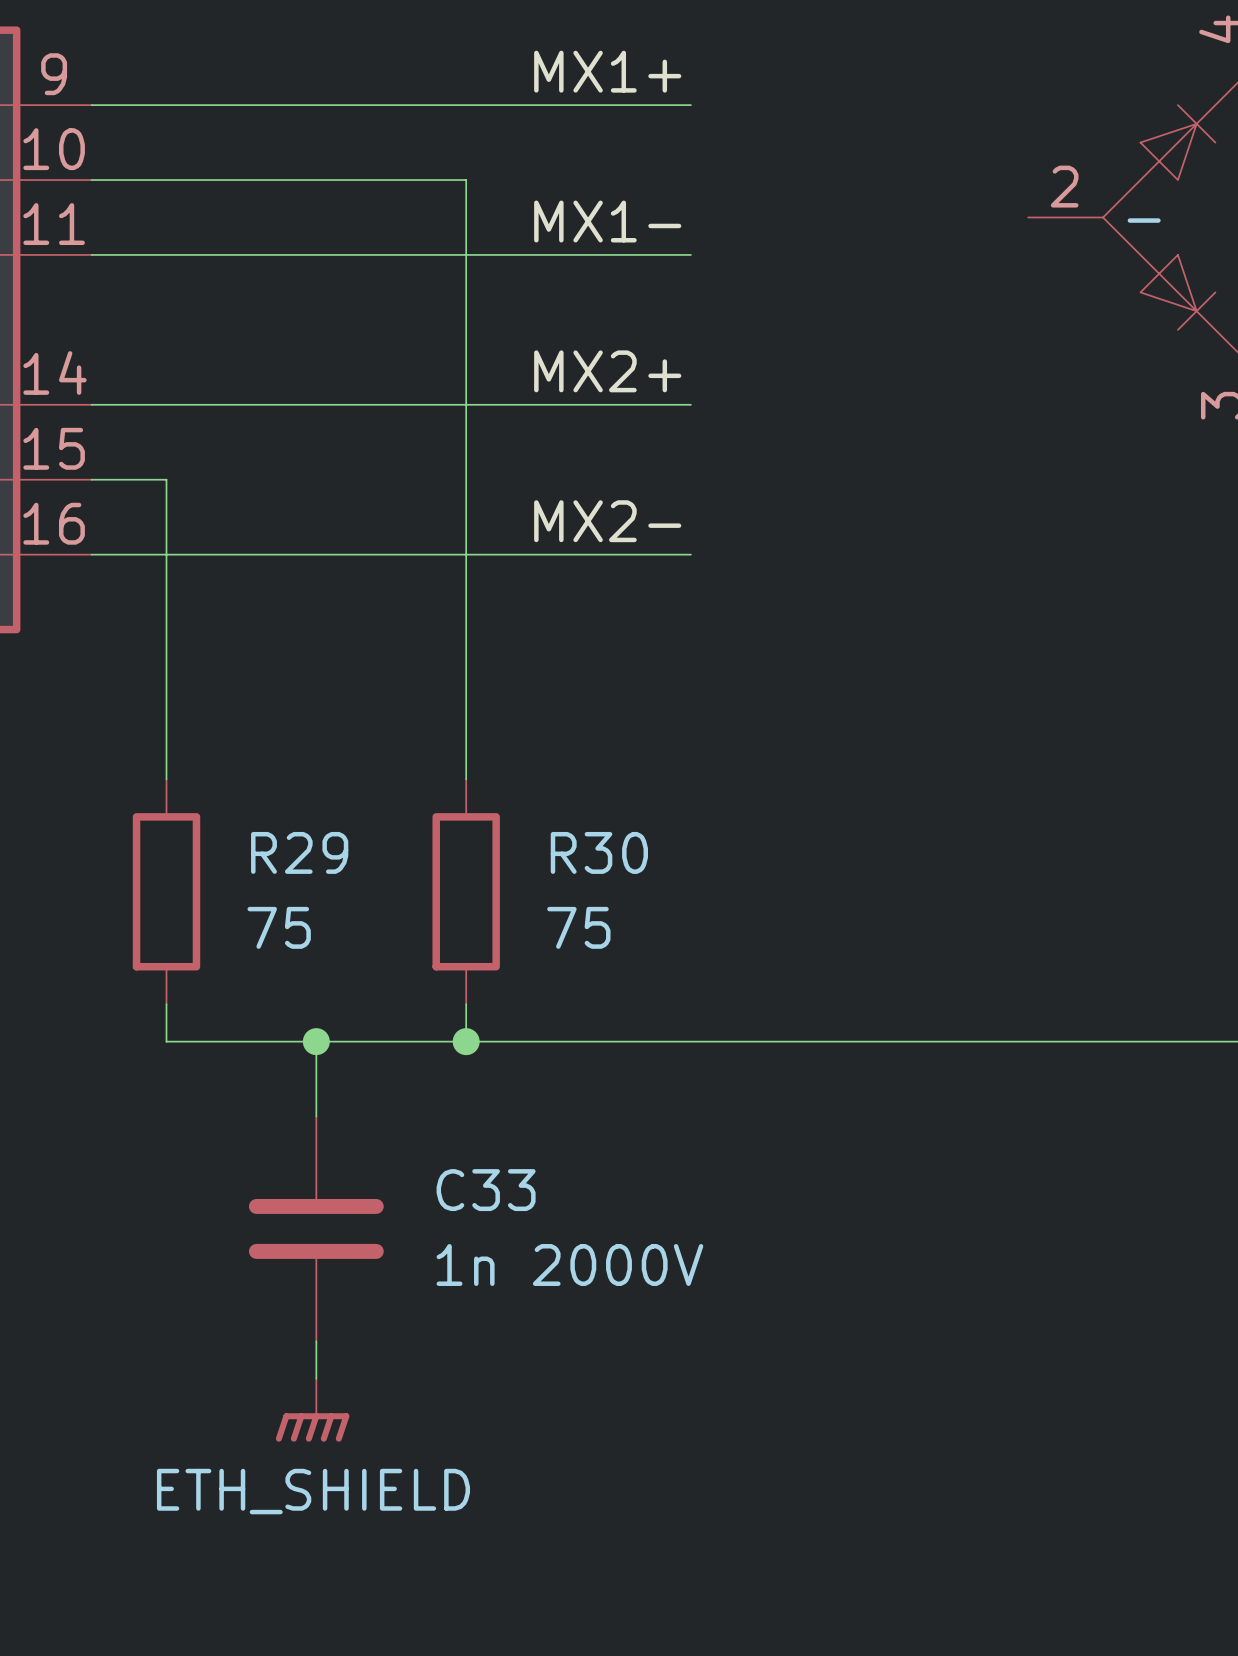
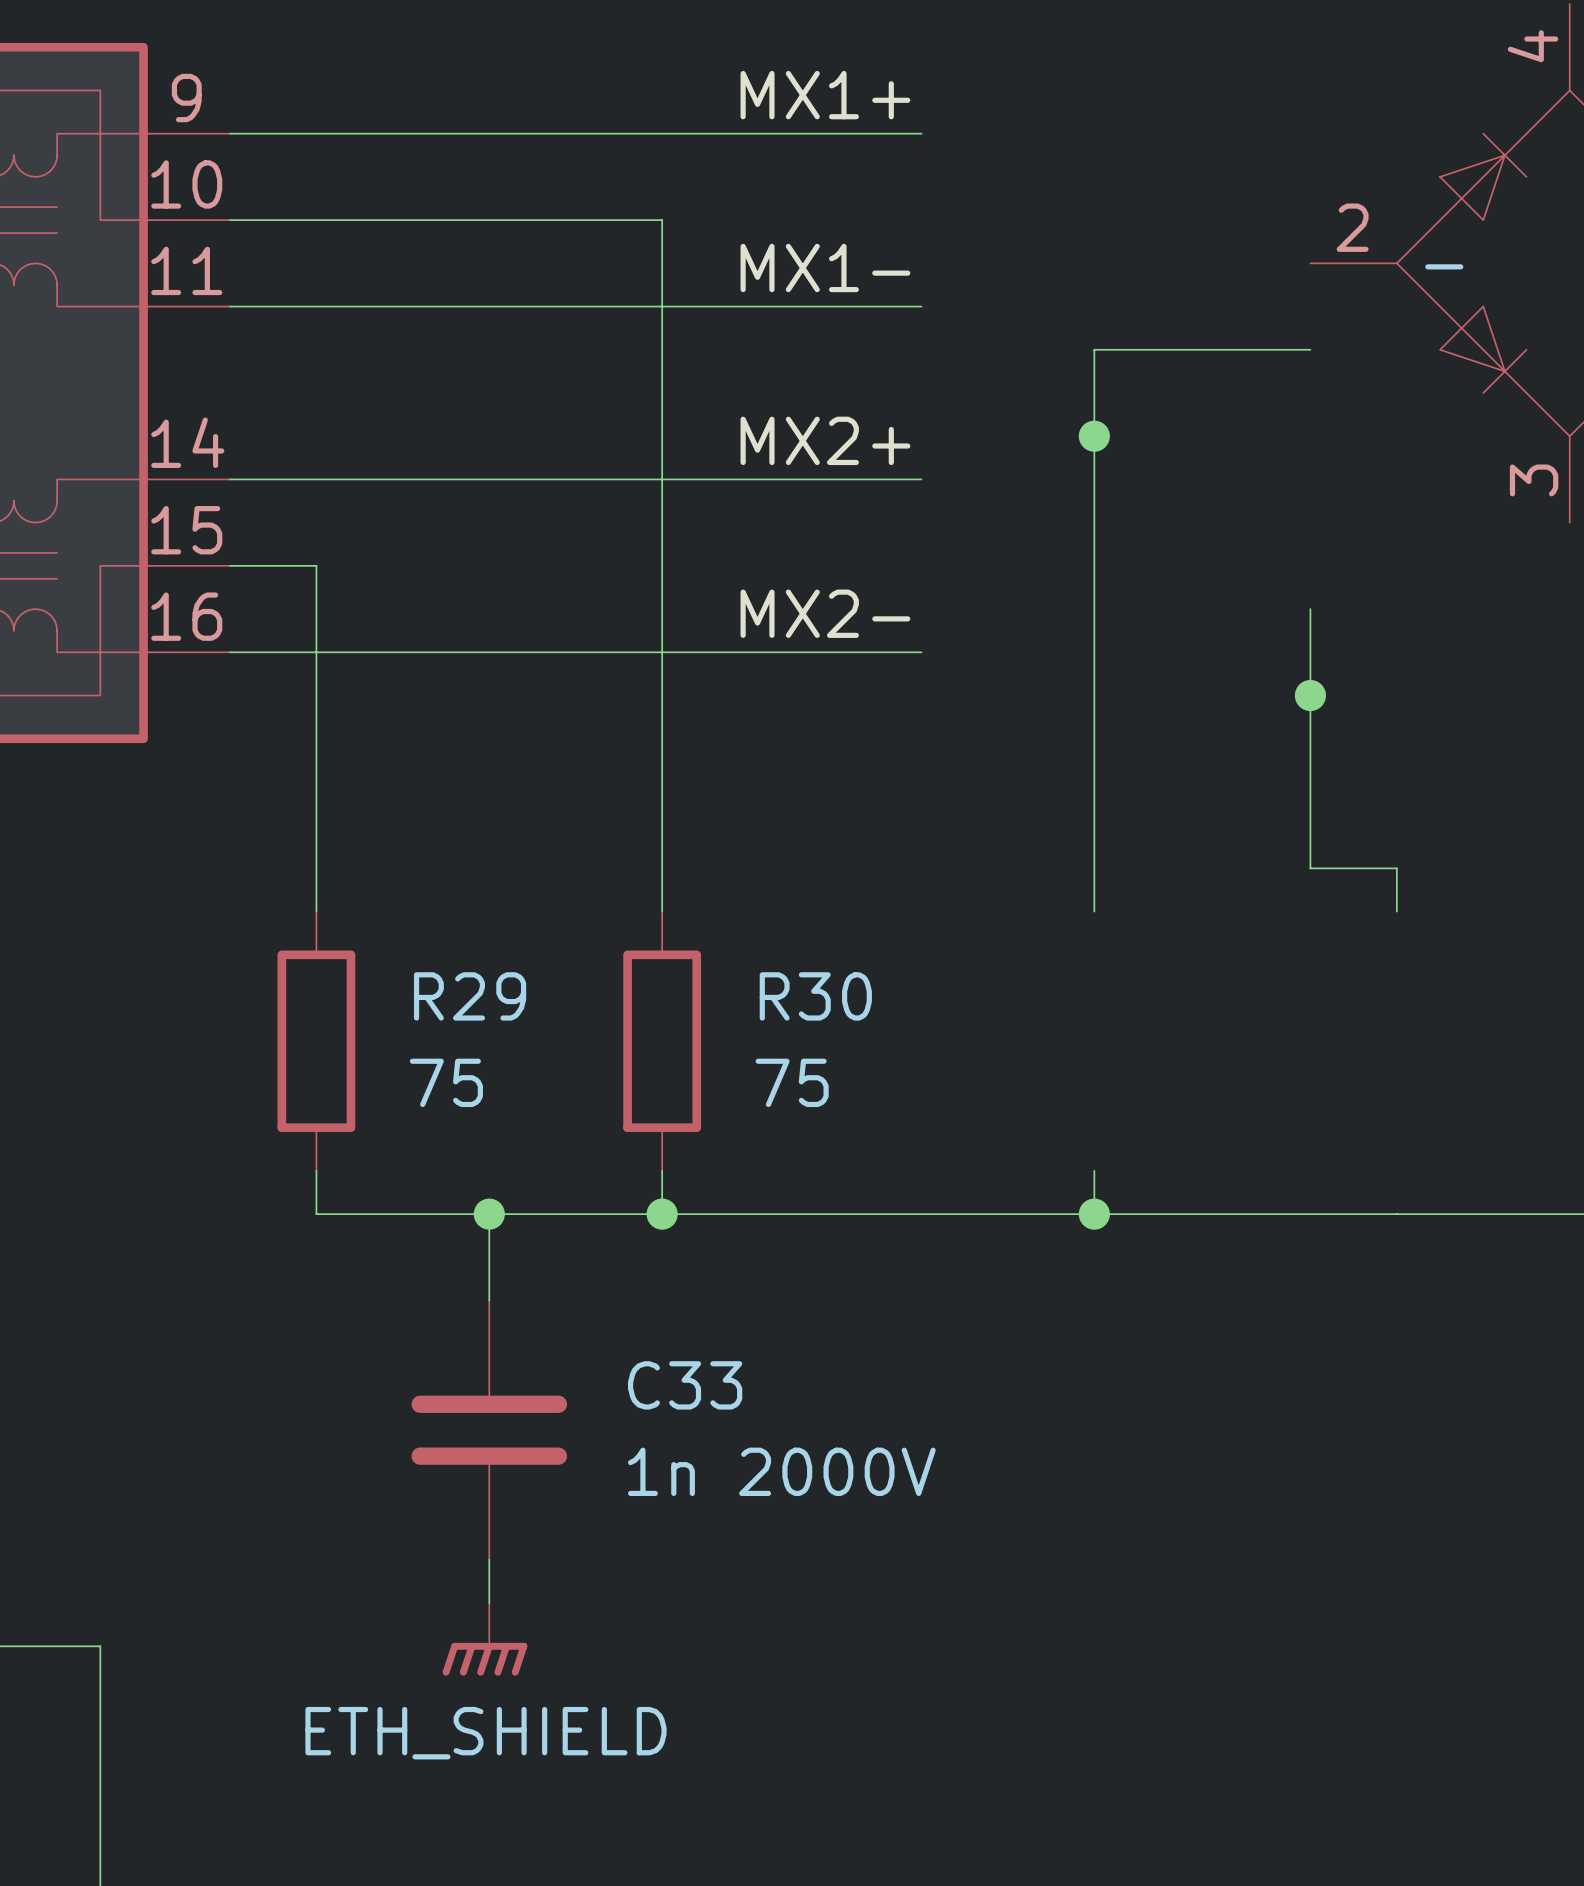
wire: none -> (1310, 349) (1094, 349) (1094, 911)
junction: none -> (1094, 436)
wire: none -> (1310, 609) (1310, 868) (1396, 868) (1396, 911)
junction: none -> (1310, 695)
wire: none -> (1094, 1170) (1094, 1214)
junction: none -> (1094, 1214)

